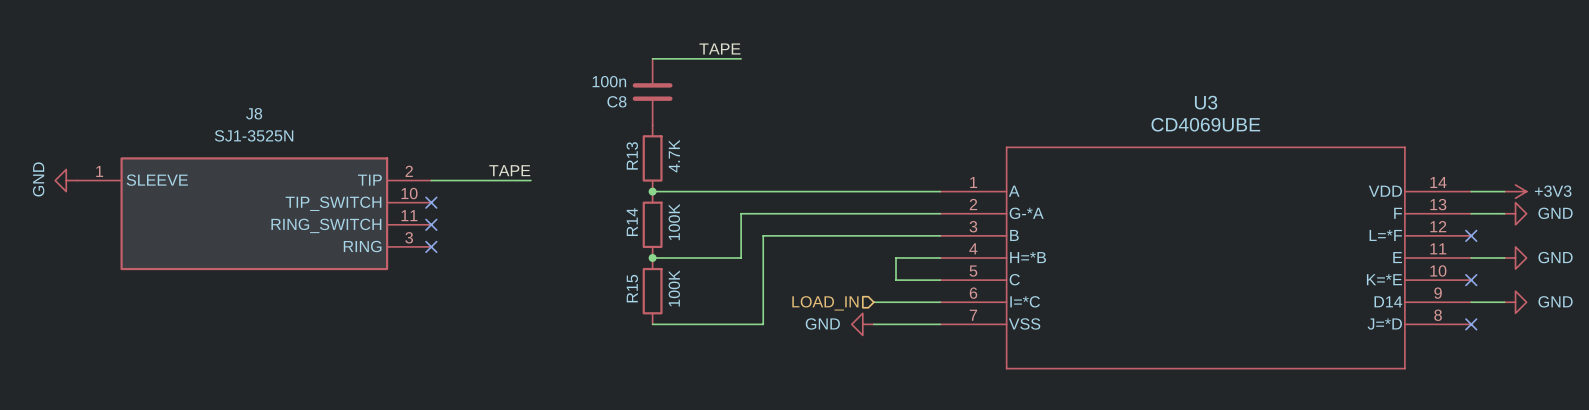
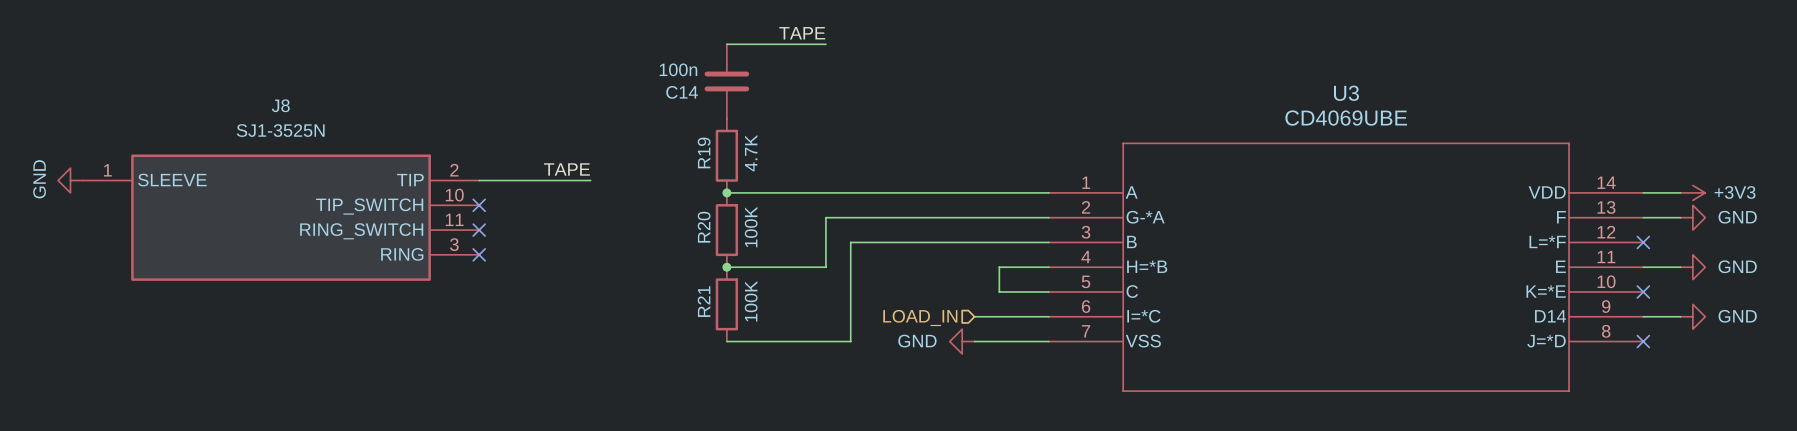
C8 name: C8 (616, 101) -> C14 (682, 92)
R13 name: R13 (632, 155) -> R19 (704, 152)
R14 name: R14 (632, 222) -> R20 (704, 227)
R15 name: R15 (632, 288) -> R21 (704, 301)

